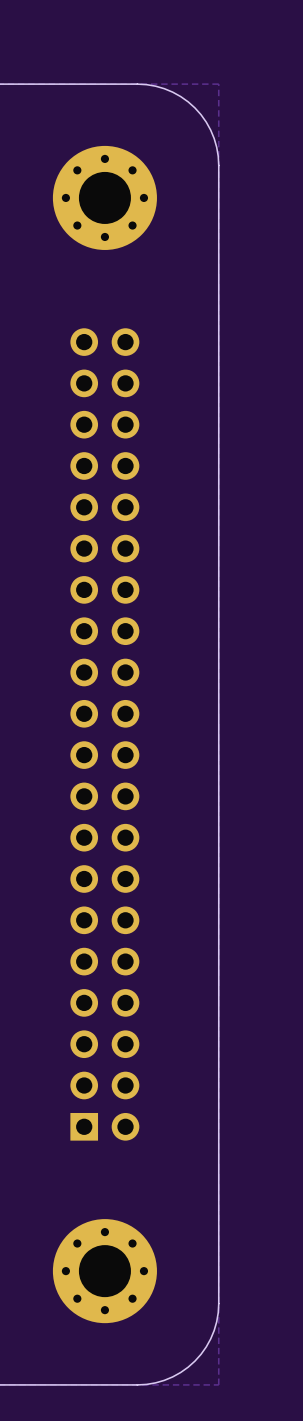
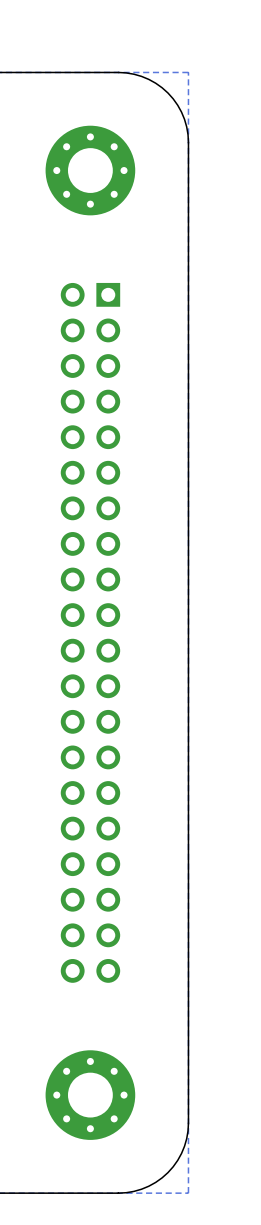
part rotation: 0° (104, 734) -> 180° (90, 632)

